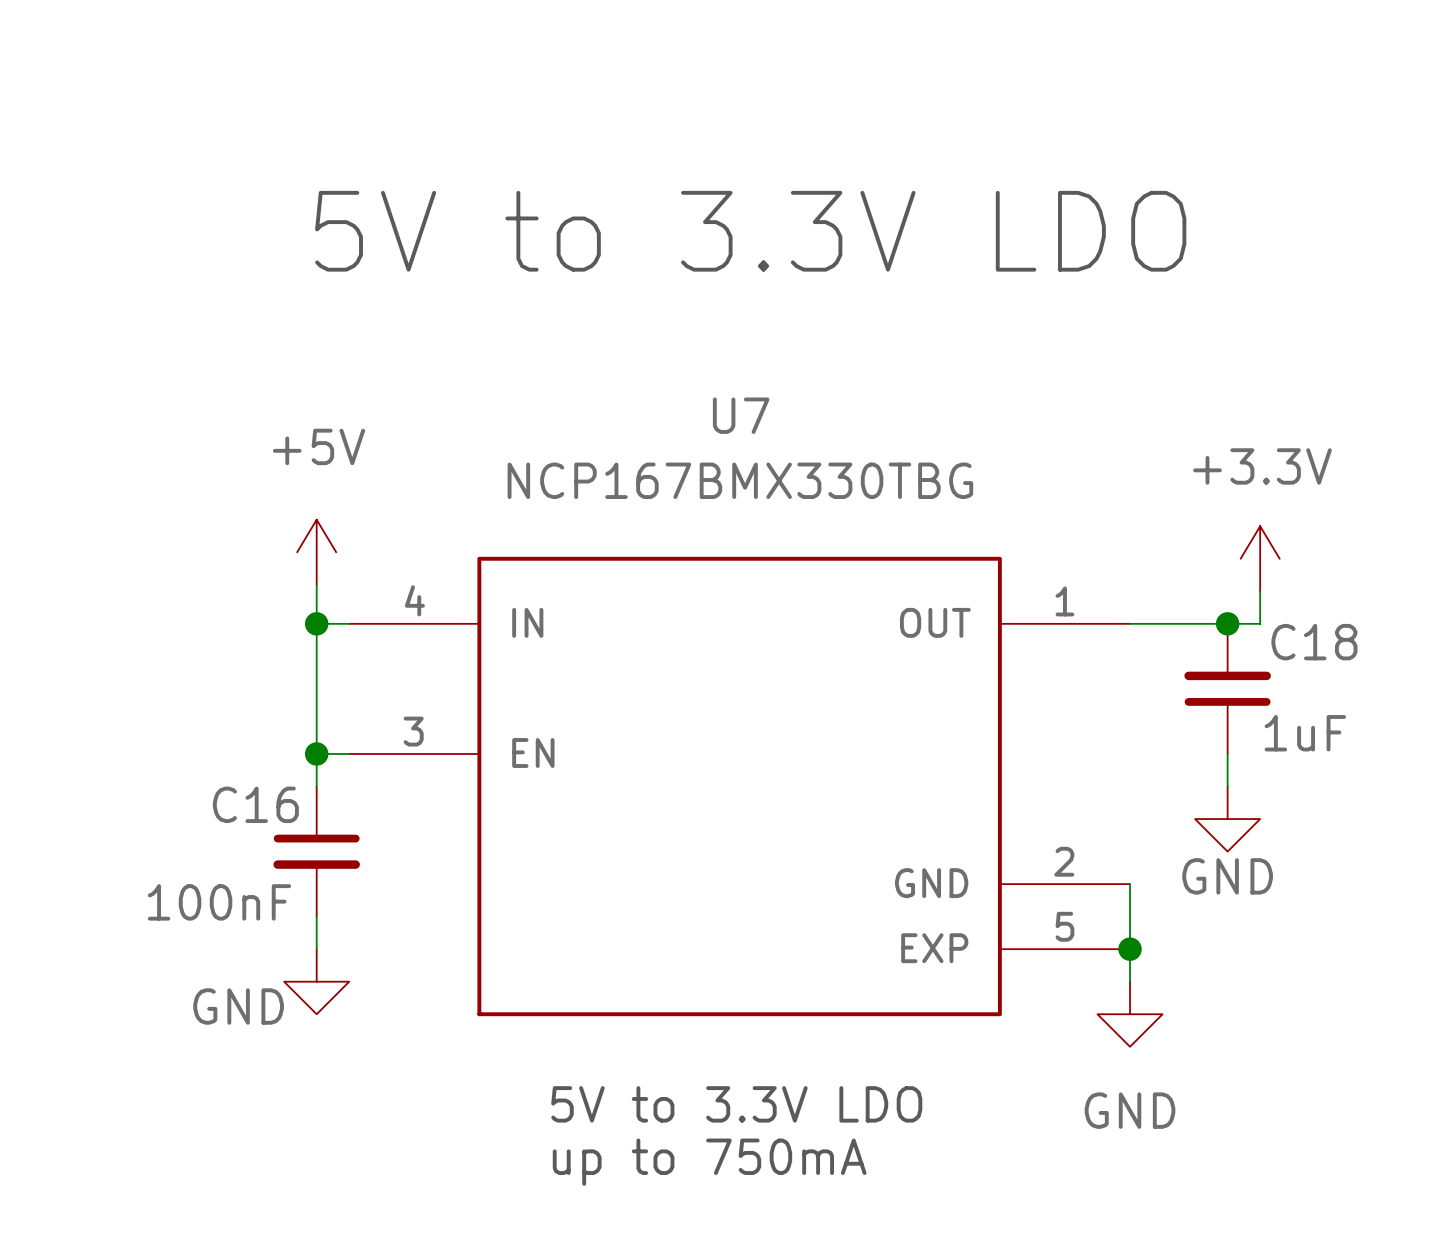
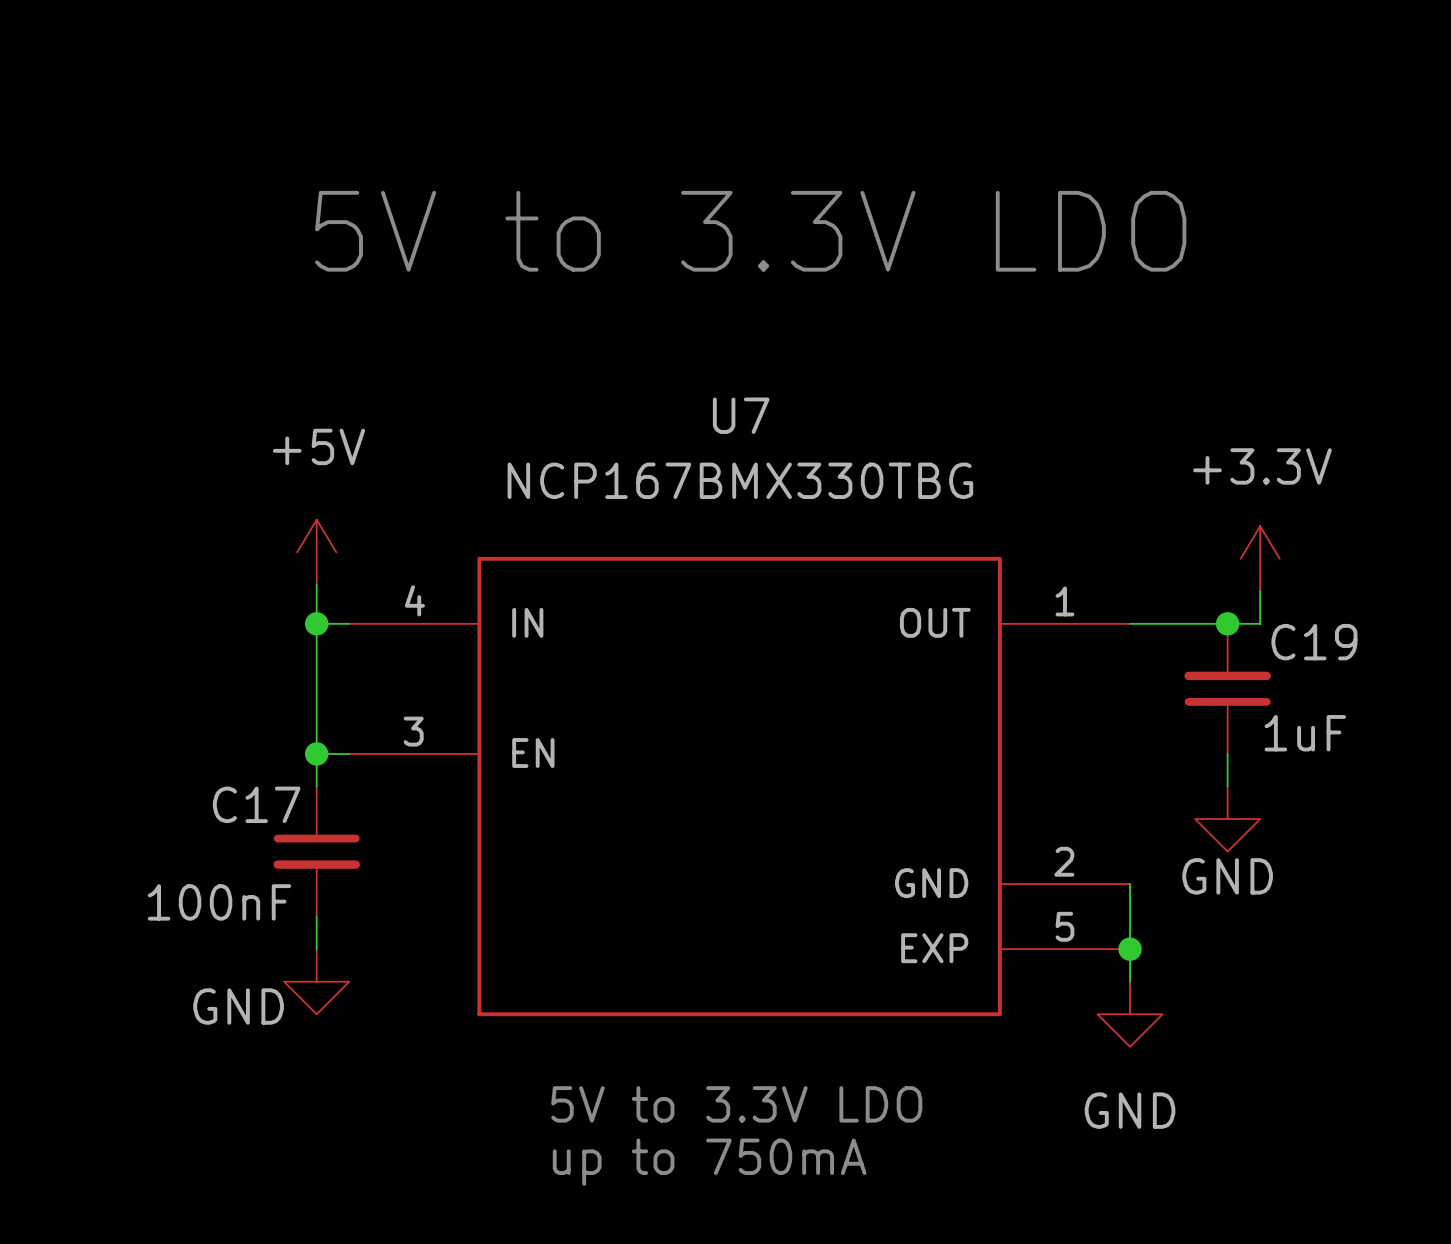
C18 name: C18 (1314, 642) -> C19 (1314, 642)
C16 name: C16 (255, 804) -> C17 (256, 804)

